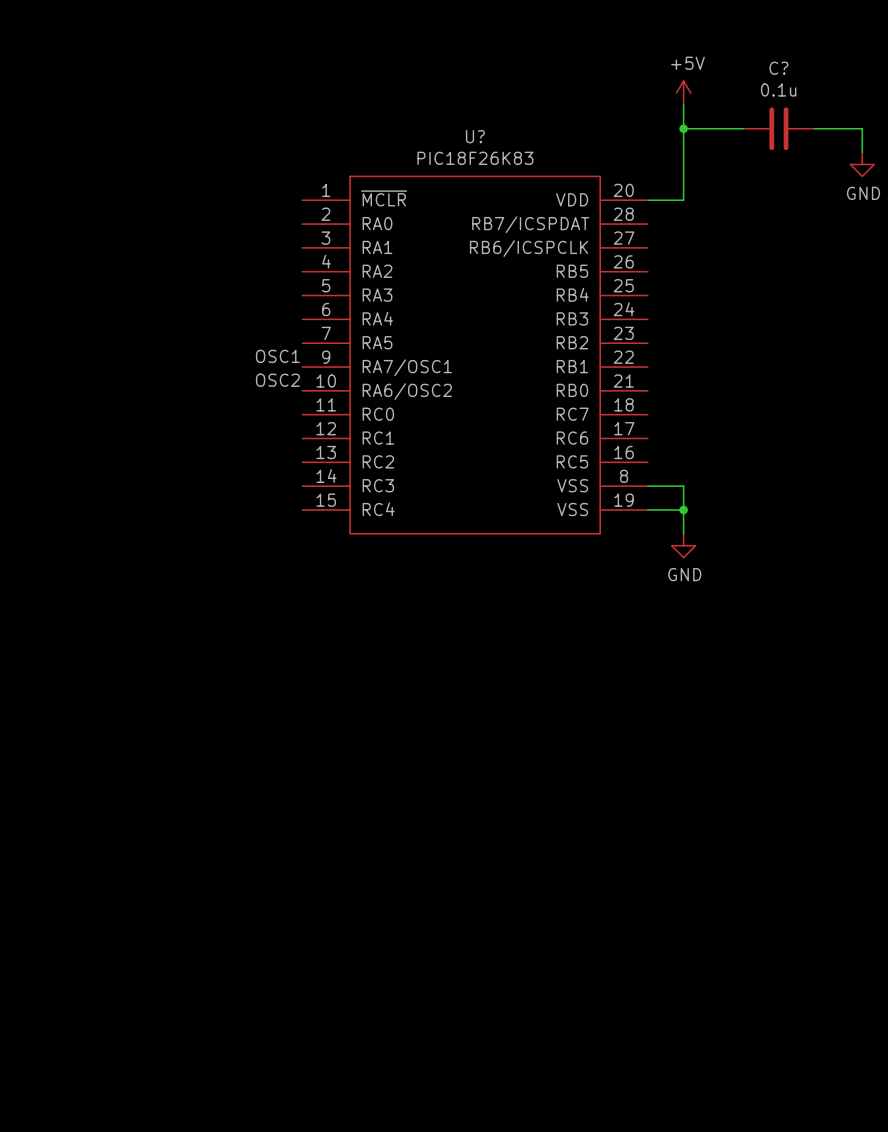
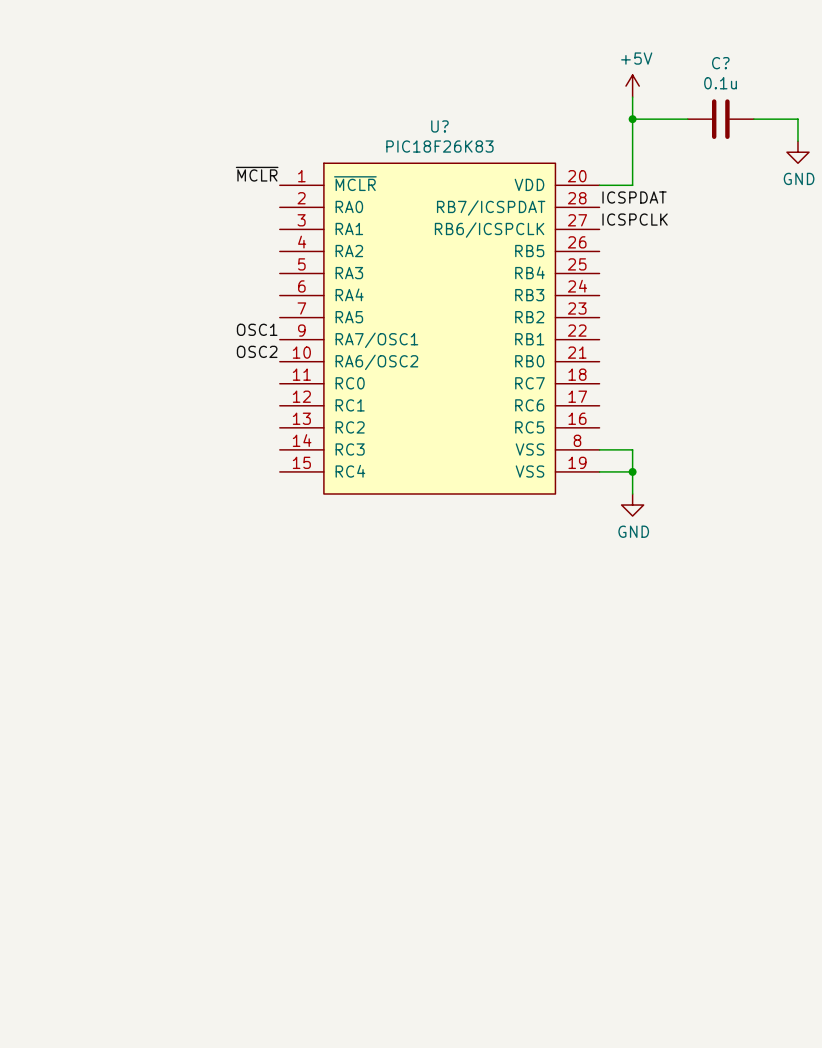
label: none -> ~{MCLR} (257, 174)
label: none -> ICSPDAT (634, 197)
label: none -> ICSPCLK (635, 219)

